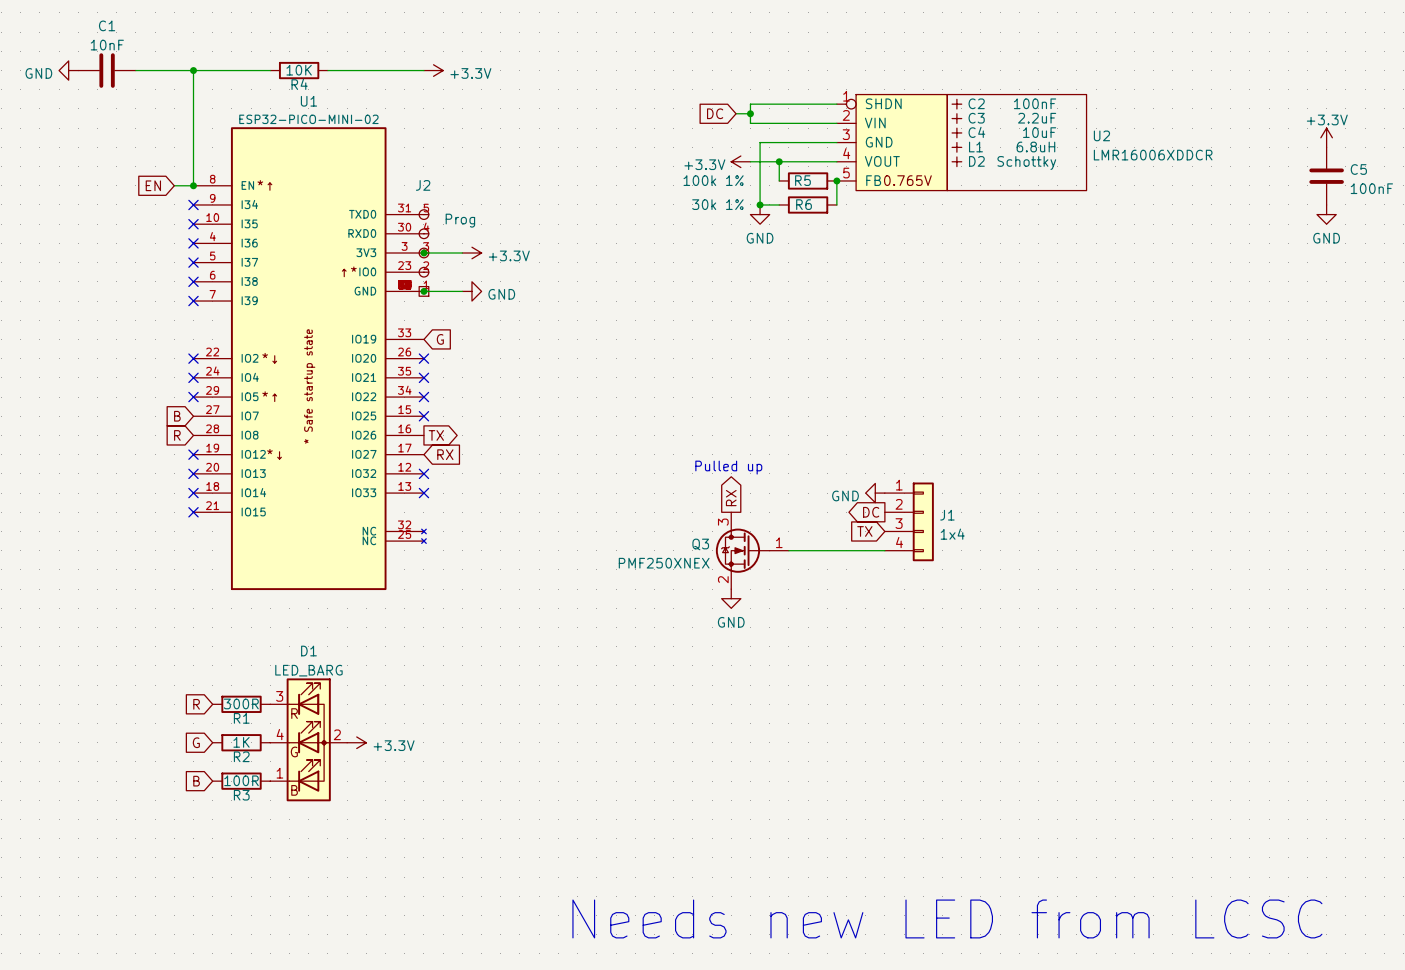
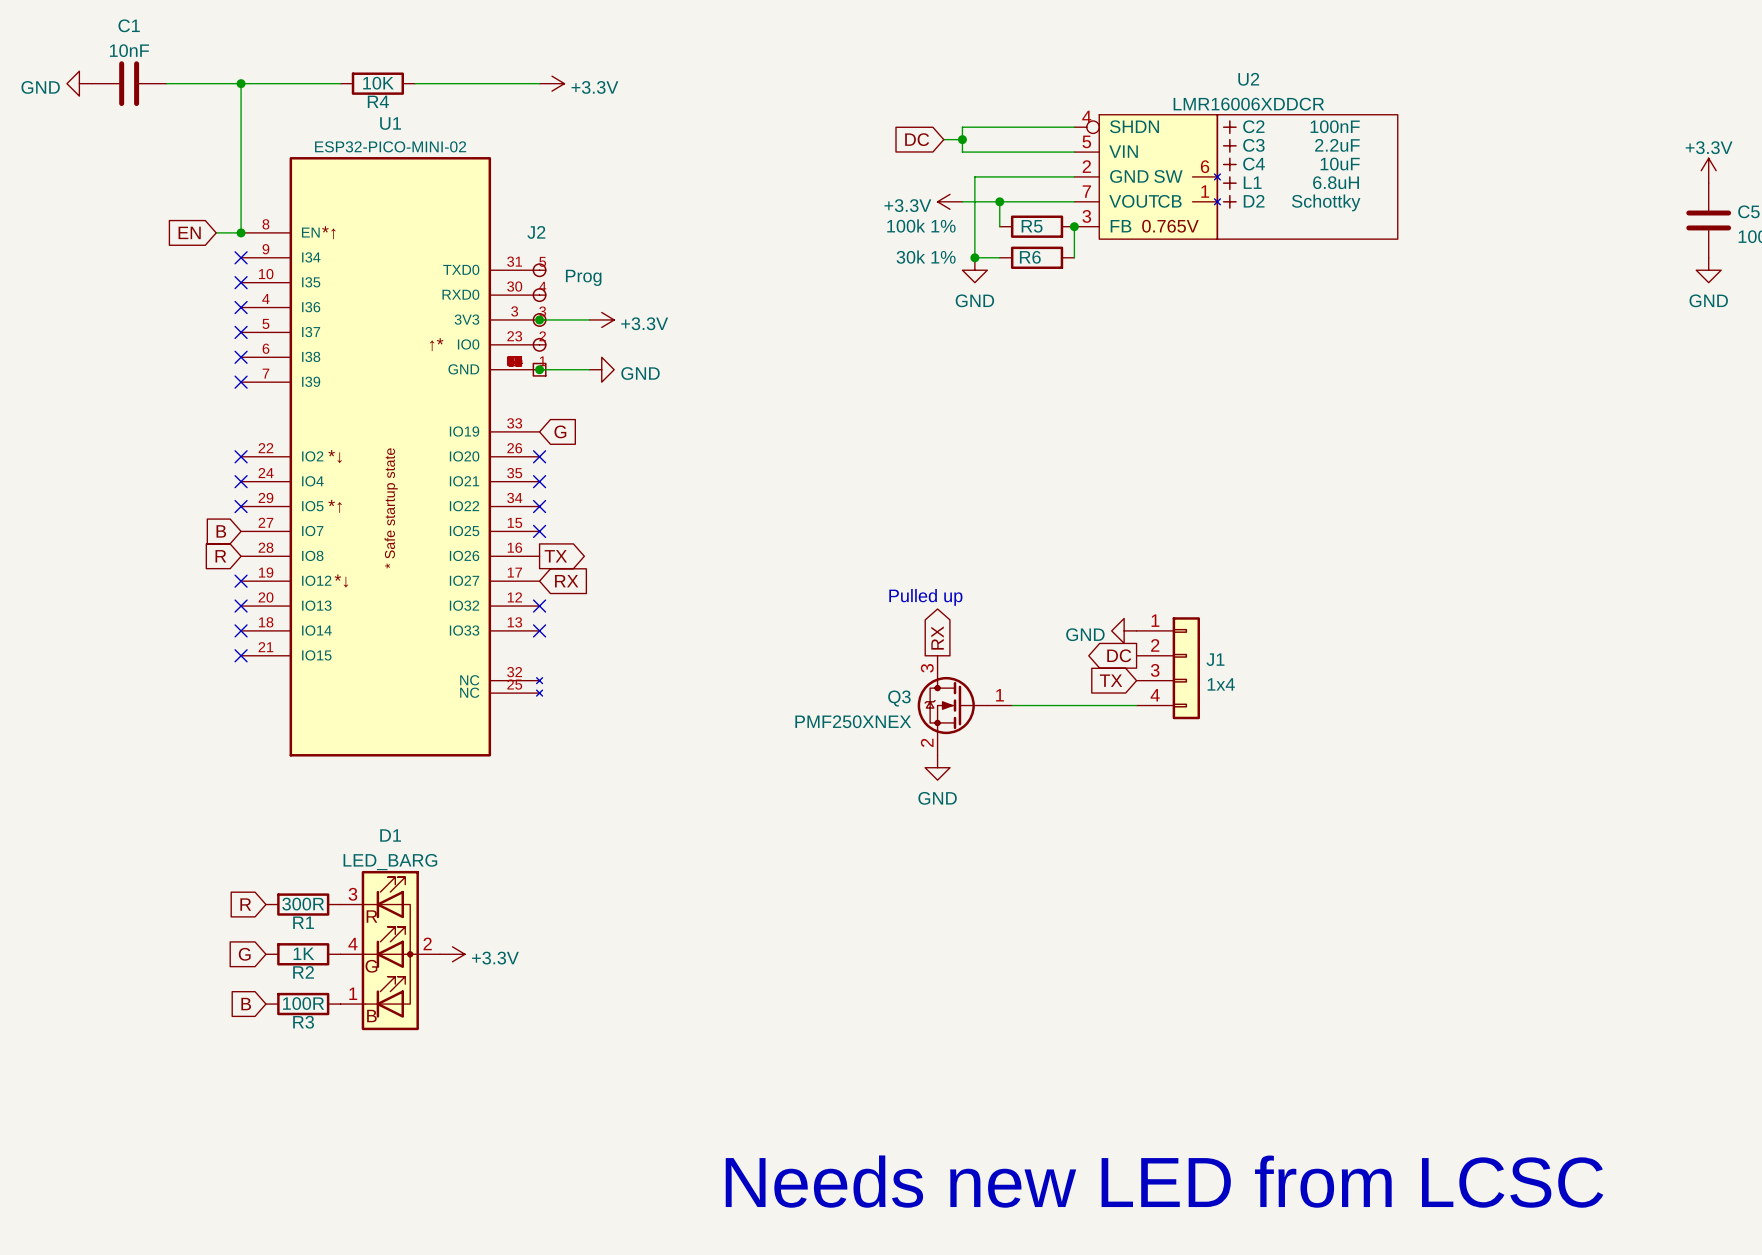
U2 symbol: [836, 94, 1087, 191] -> [1074, 114, 1398, 240]
U2 name position: U2 (1101, 135) -> U2 (1248, 79)
U2 value position: LMR16006XDDCR (1153, 155) -> LMR16006XDDCR (1248, 104)

